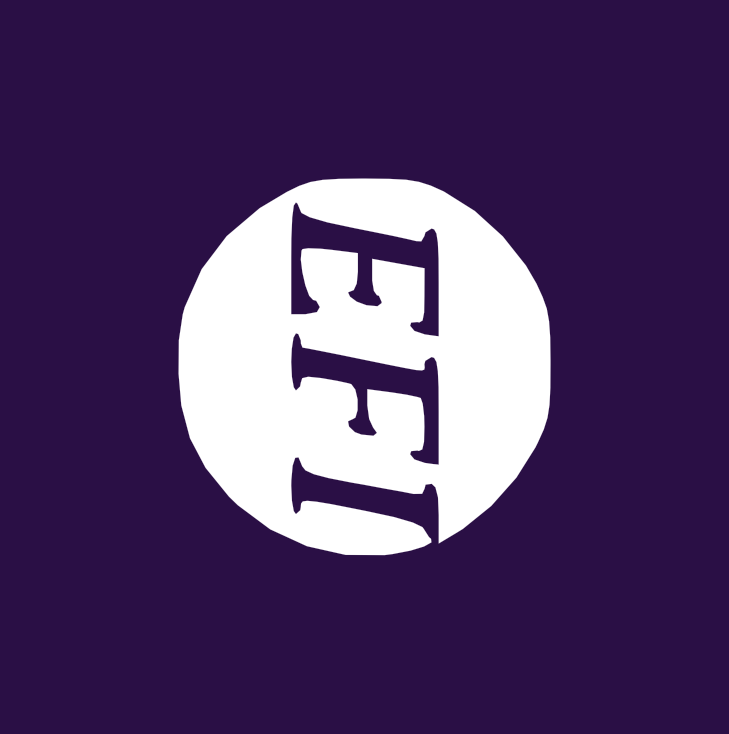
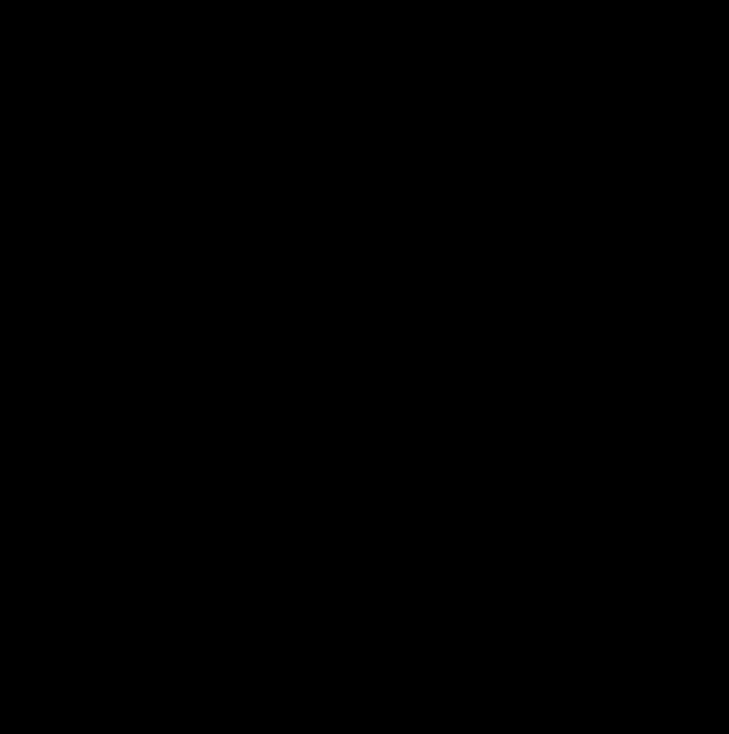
drawing: [178, 178, 551, 556] -> none

